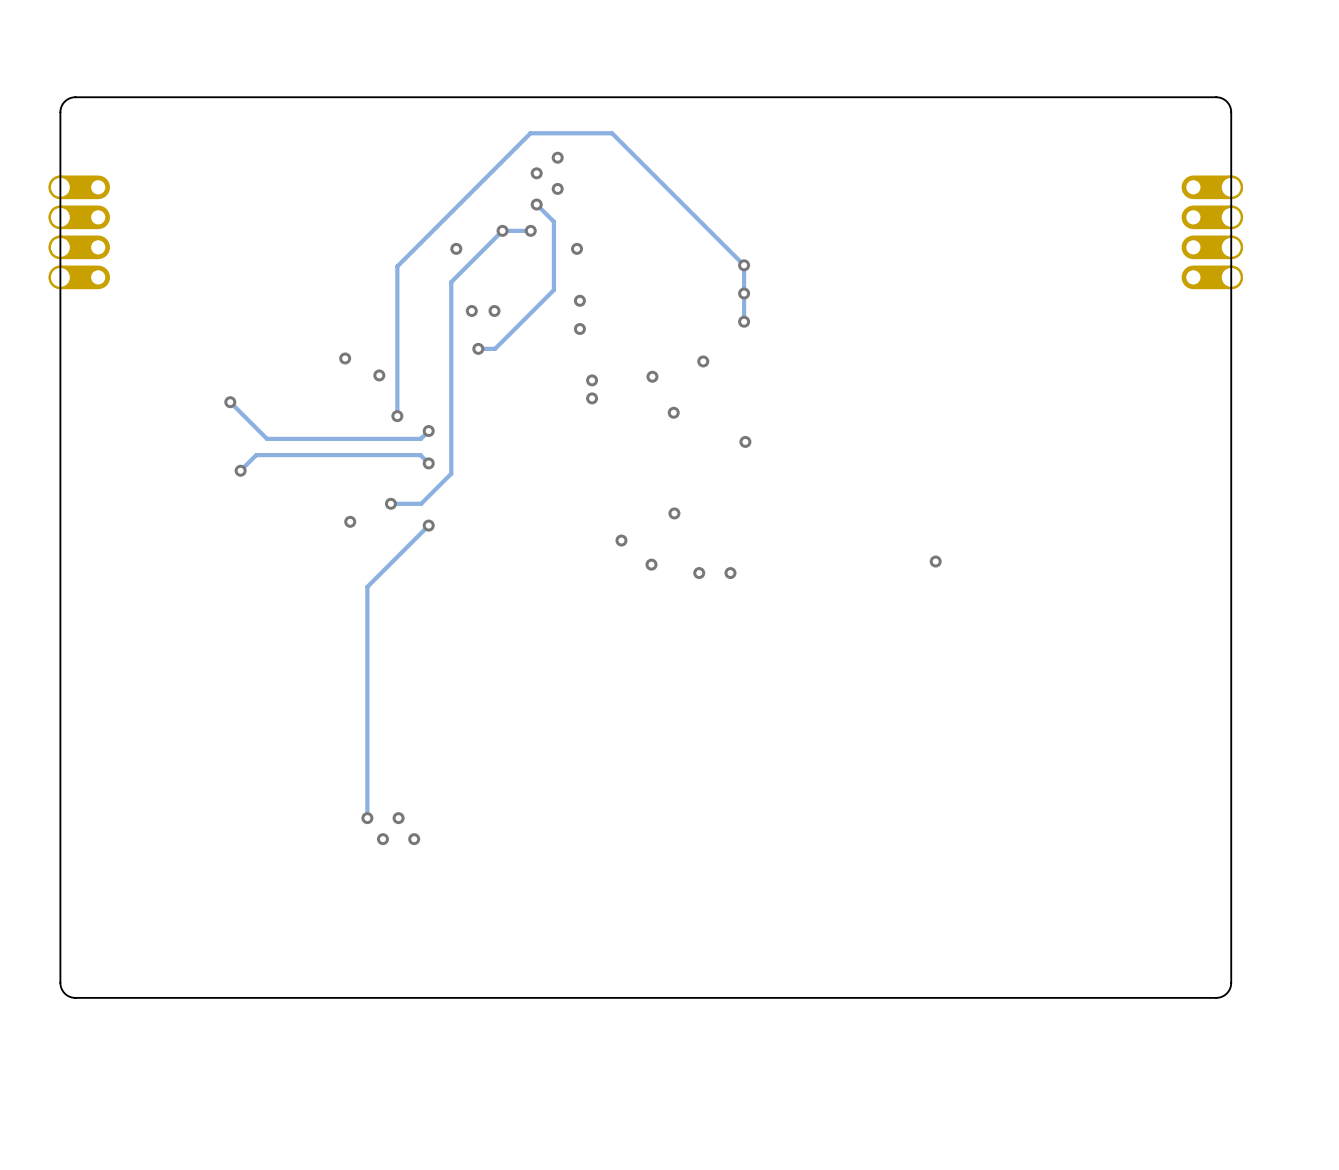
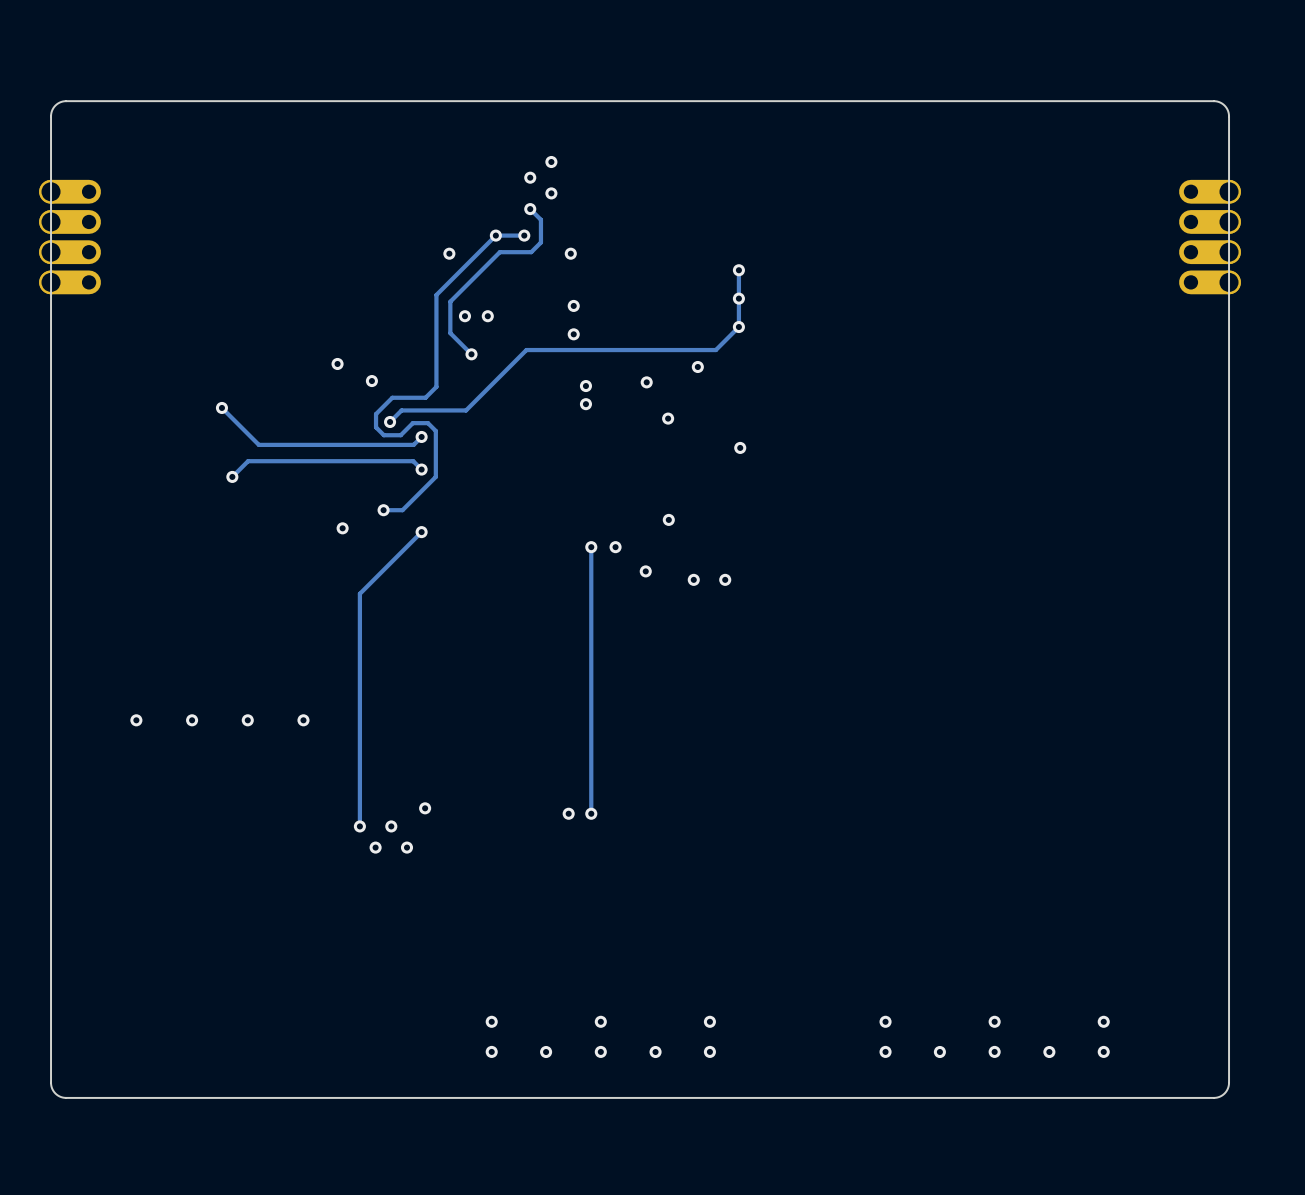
track: (547, 215) (553, 221) (553, 289) (495, 348) (478, 348) -> (540, 219) (540, 242) (531, 252) (499, 252) (450, 301) (450, 333) (471, 354)
track: (744, 265) (612, 133) (530, 133) (397, 266) (397, 416) -> (738, 327) (715, 350) (526, 350) (466, 410) (401, 410) (390, 421)
track: (451, 282) (451, 473) (421, 503) (409, 503) -> (444, 287) (436, 295) (436, 386) (425, 397) (392, 397) (376, 414) (376, 427) (383, 435) (400, 435) (412, 423) (427, 423) (435, 430) (435, 476) (402, 510)
track: none -> (591, 547) (591, 813)
via: none -> (591, 547)
via: (935, 561) -> none
via: none -> (136, 720)
via: none -> (192, 720)
via: none -> (247, 720)
via: none -> (303, 720)
via: none -> (425, 808)
via: none -> (568, 813)
via: none -> (591, 813)
board edge: (1231, 982) (1226, 993) (1216, 997) (75, 997) (64, 993) (60, 982) -> (1229, 992) (1228, 1084) (1223, 1094) (1213, 1097) (64, 1097) (55, 1093) (51, 1084) (51, 992)
via: none -> (491, 1021)
via: none -> (600, 1021)
via: none -> (709, 1021)
via: none -> (885, 1021)
via: none -> (994, 1021)
via: none -> (1103, 1021)
via: none -> (491, 1051)
via: none -> (546, 1052)
via: none -> (600, 1051)
via: none -> (655, 1052)
via: none -> (709, 1051)
via: none -> (885, 1051)
via: none -> (939, 1052)
via: none -> (994, 1051)
via: none -> (1049, 1052)
via: none -> (1103, 1051)

